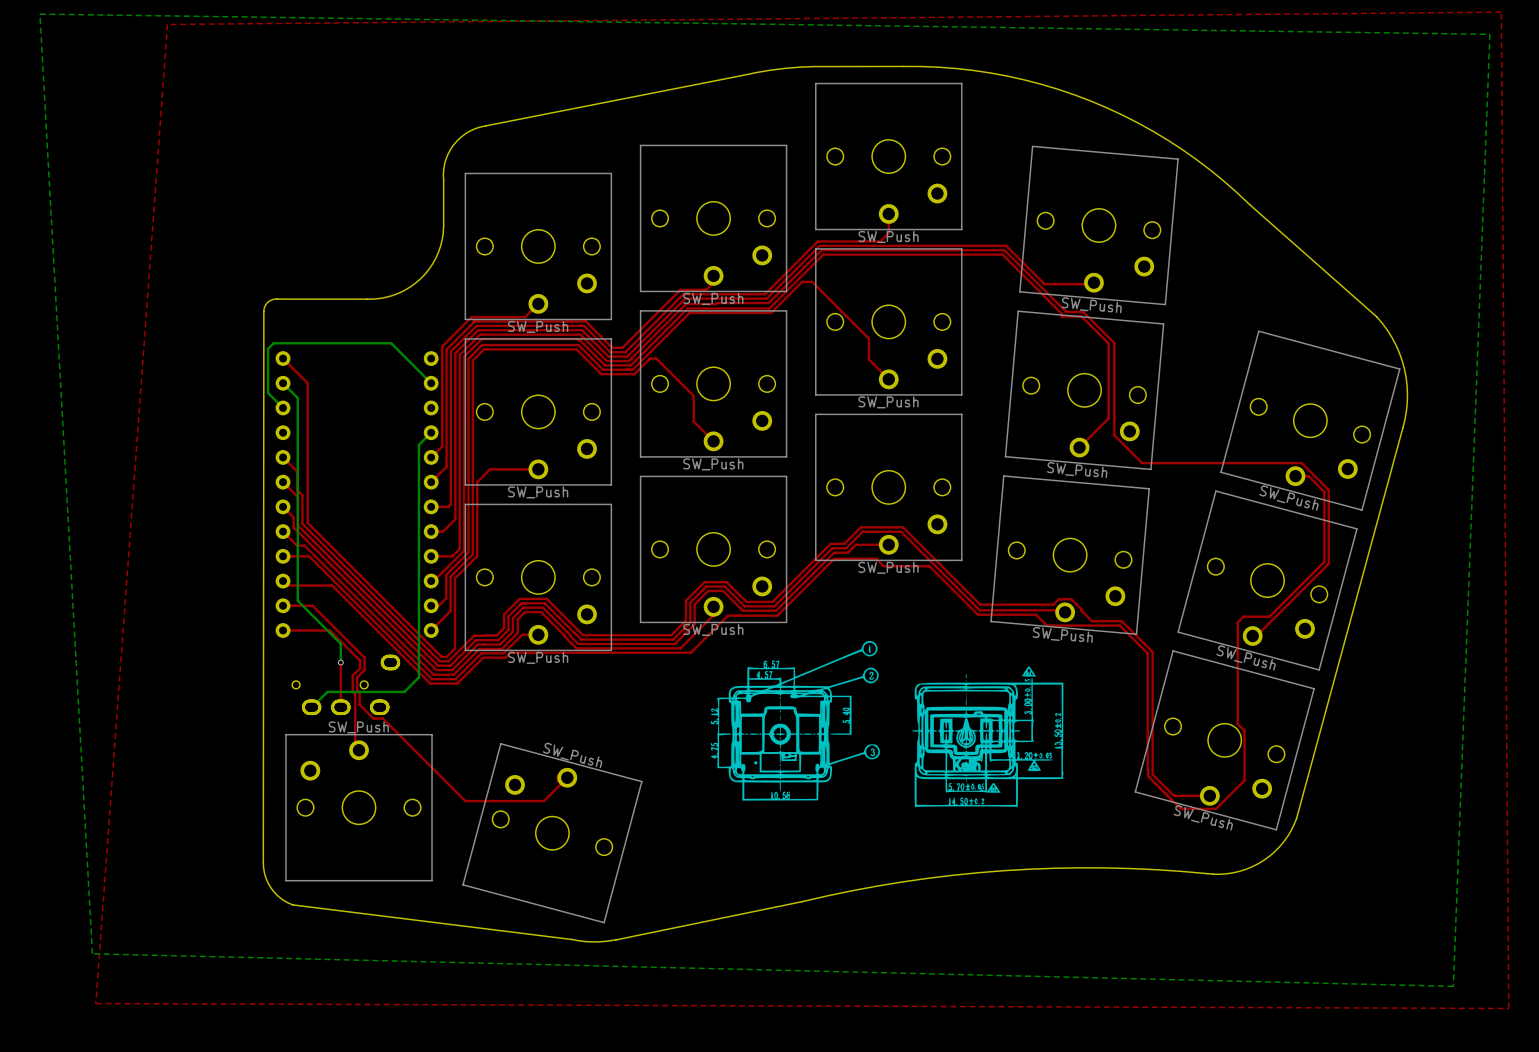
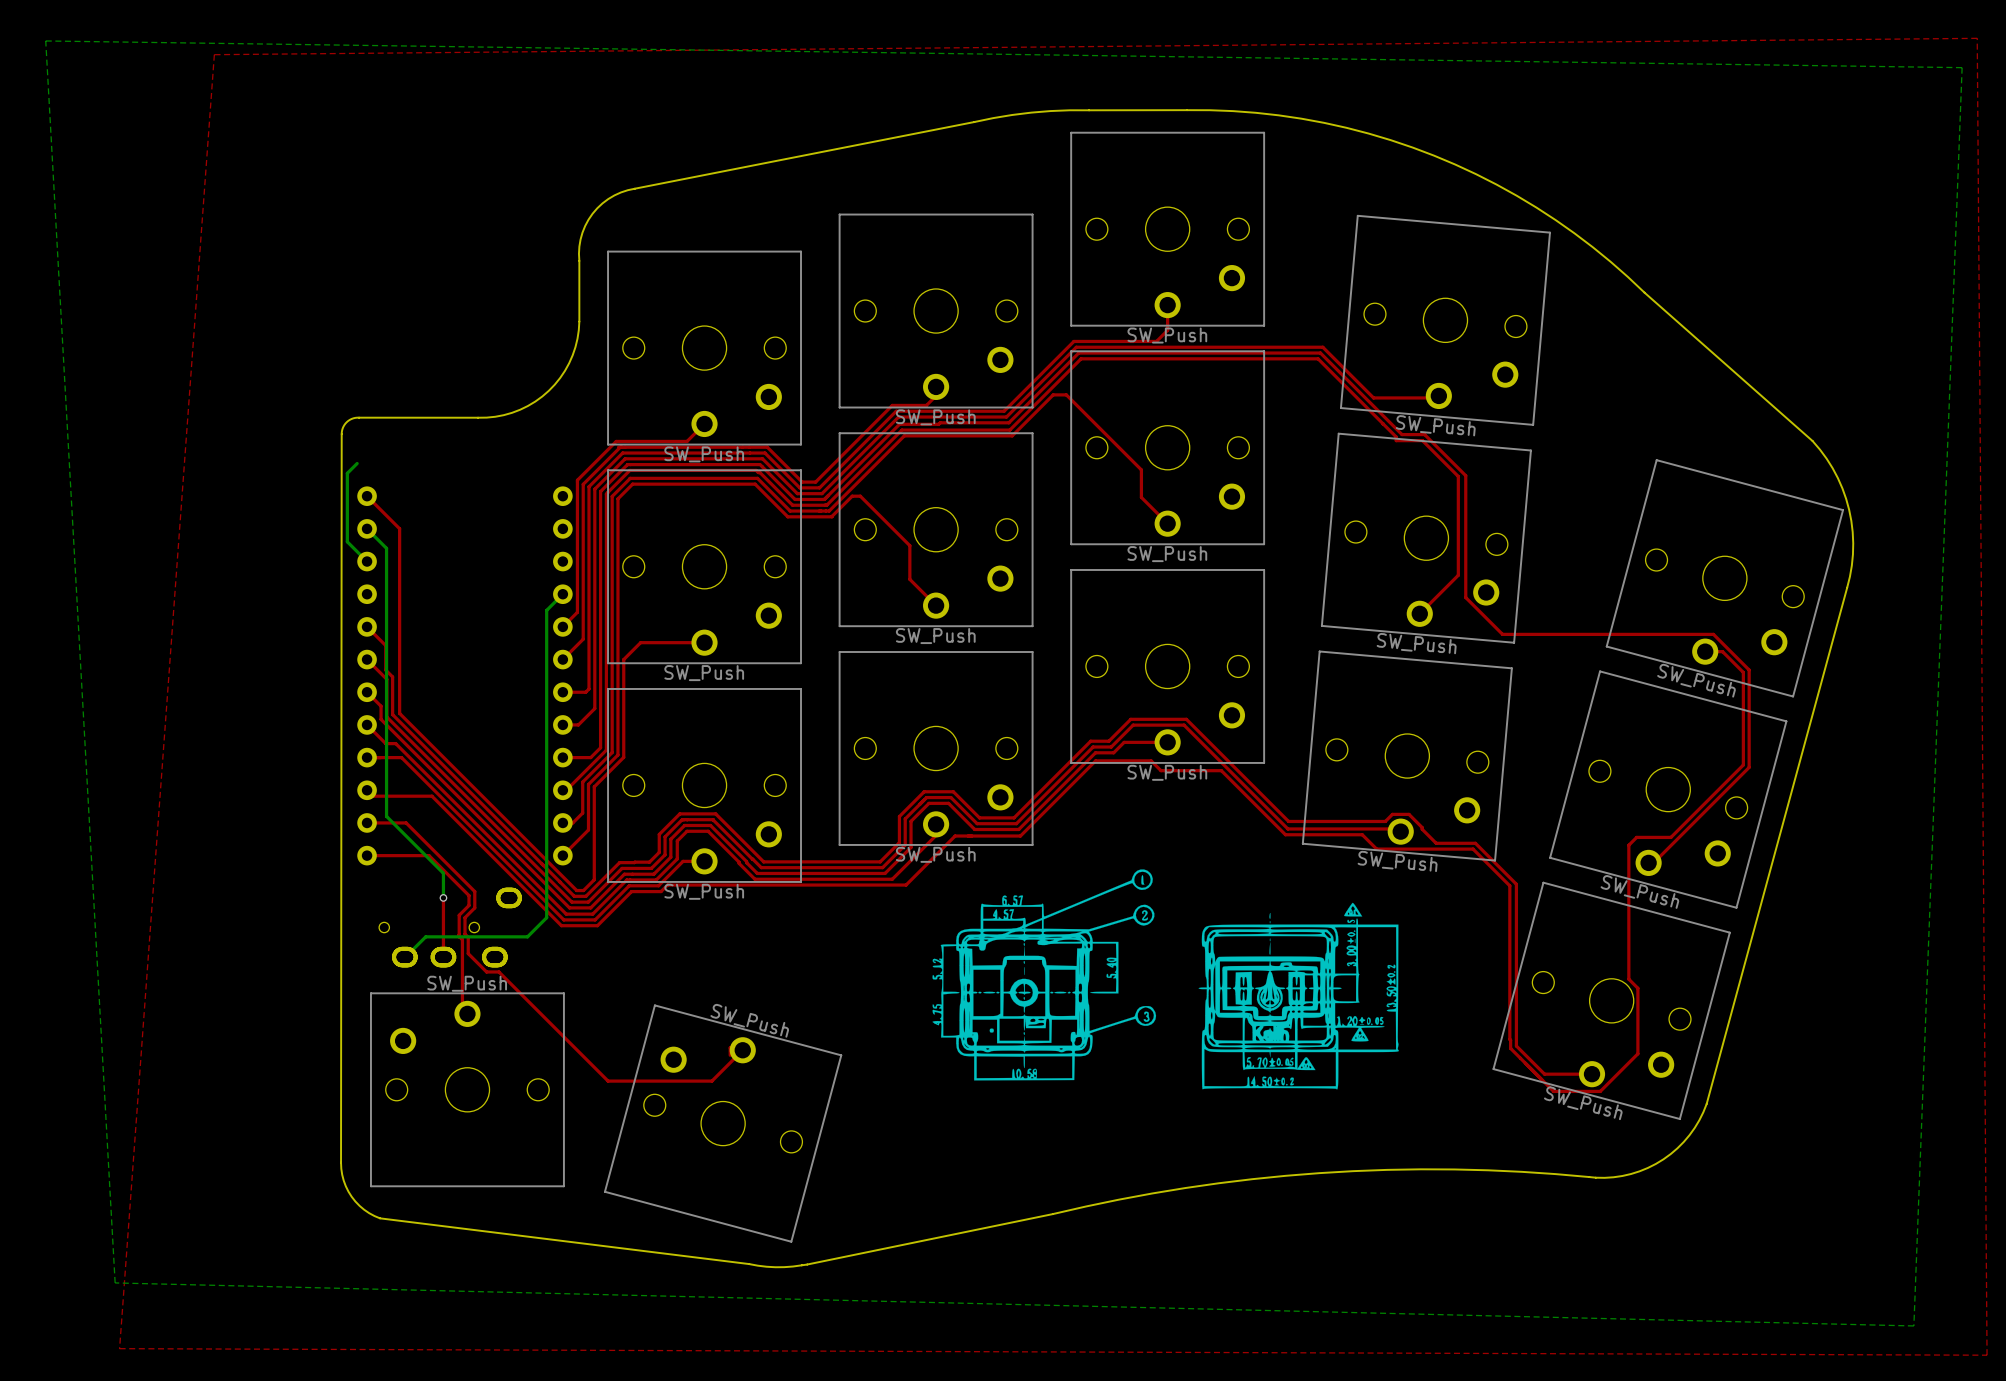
bottom track: (268, 348) (273, 343) (391, 343) (431, 383) -> (347, 483) (347, 473) (357, 463)

